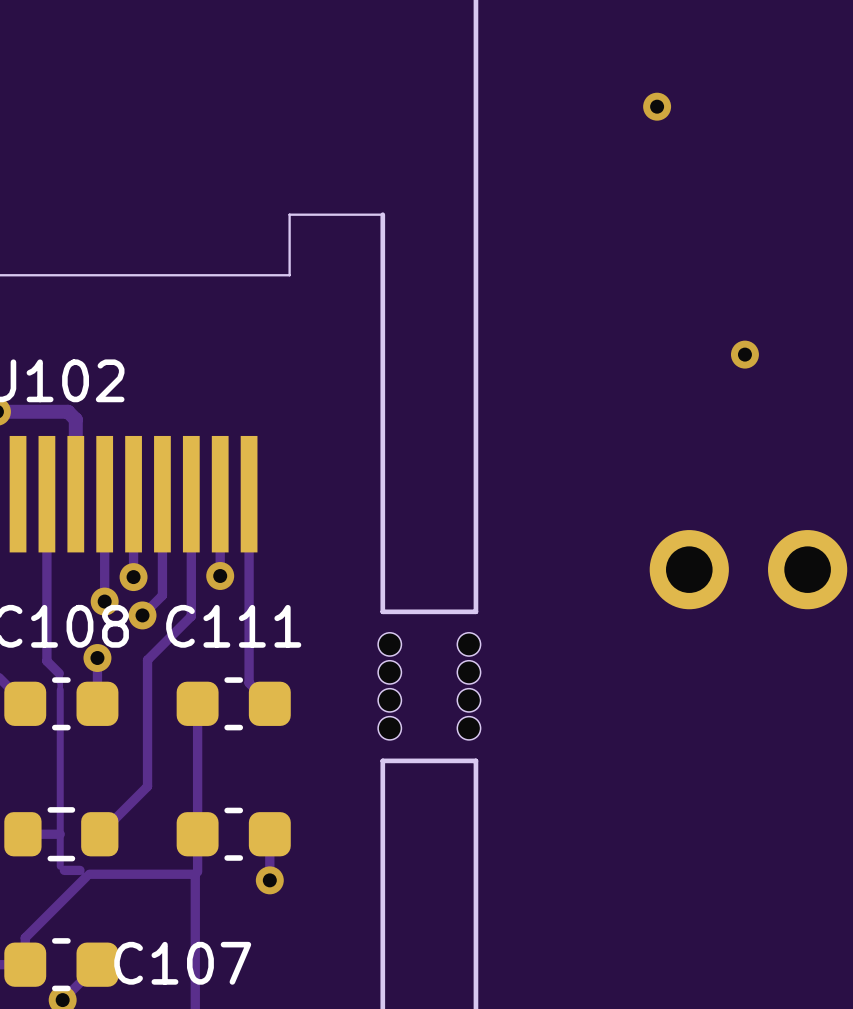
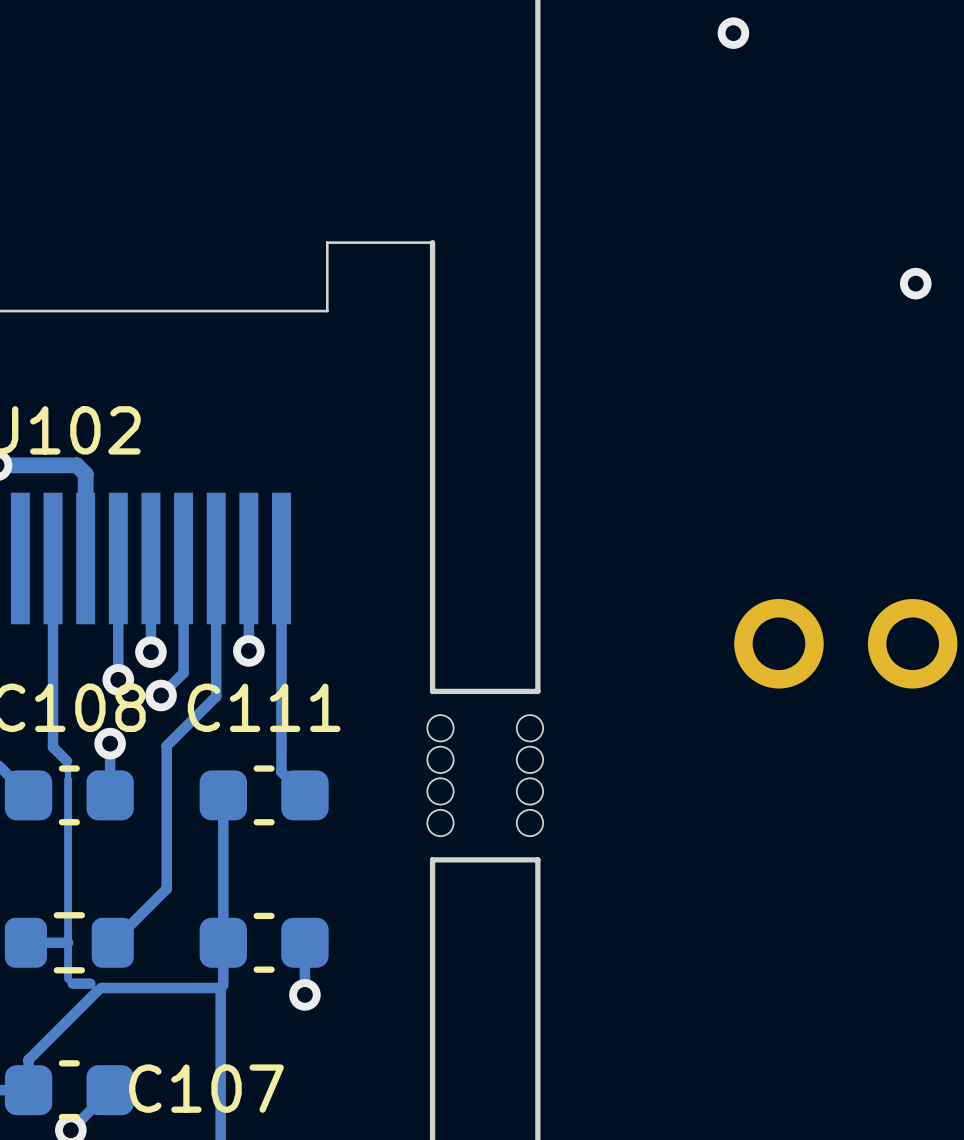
via position: (657, 106) -> (733, 33)
via: none -> (915, 283)
via: (744, 354) -> none

